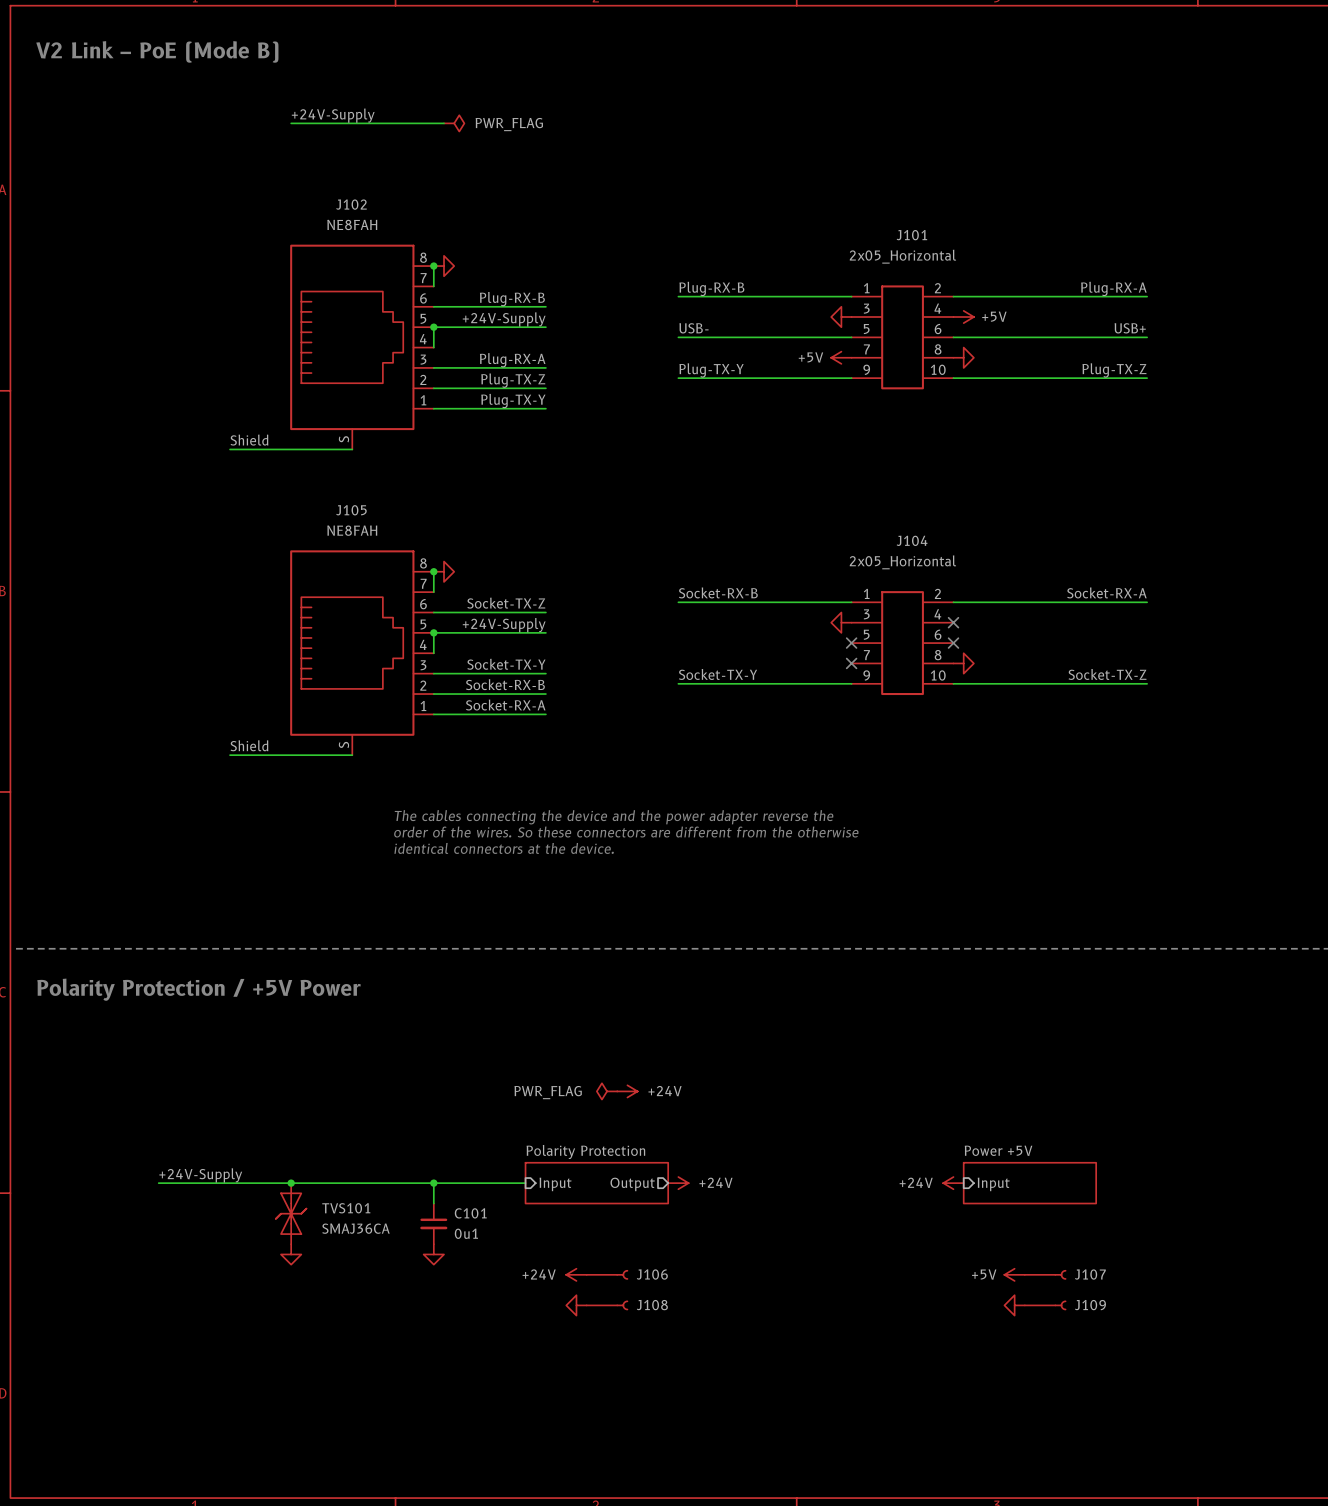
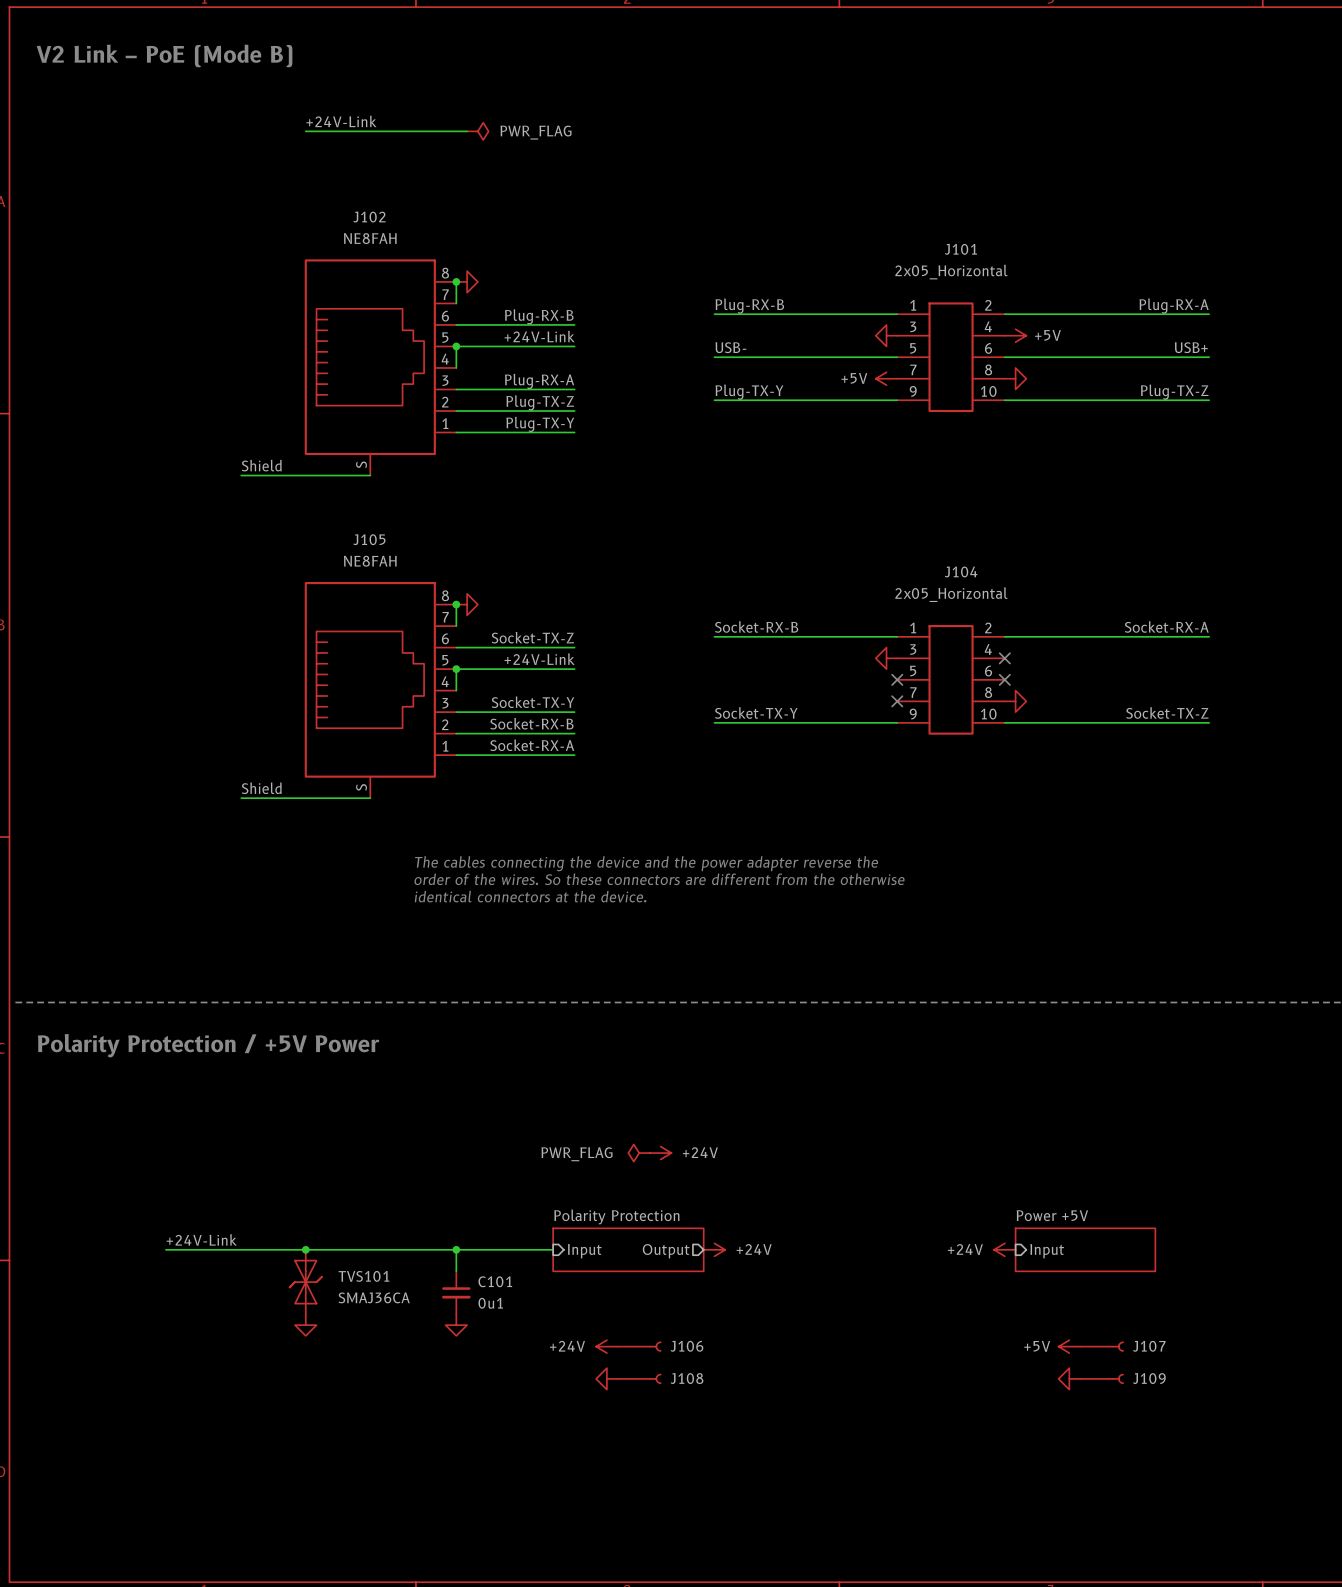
label: +24V-Supply (333, 115) -> +24V-Link (341, 121)
label: +24V-Supply (504, 319) -> +24V-Link (539, 336)
label: +24V-Supply (504, 625) -> +24V-Link (539, 659)
label: +24V-Supply (200, 1175) -> +24V-Link (201, 1239)

